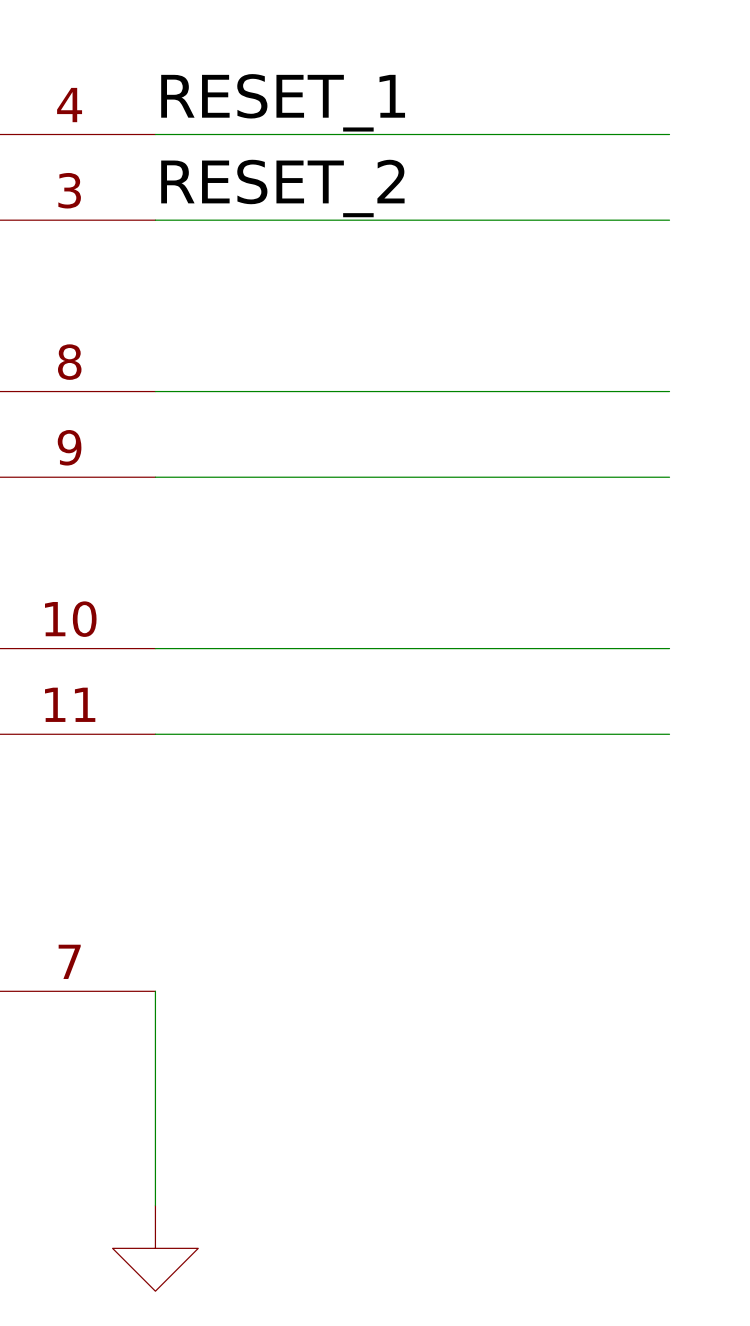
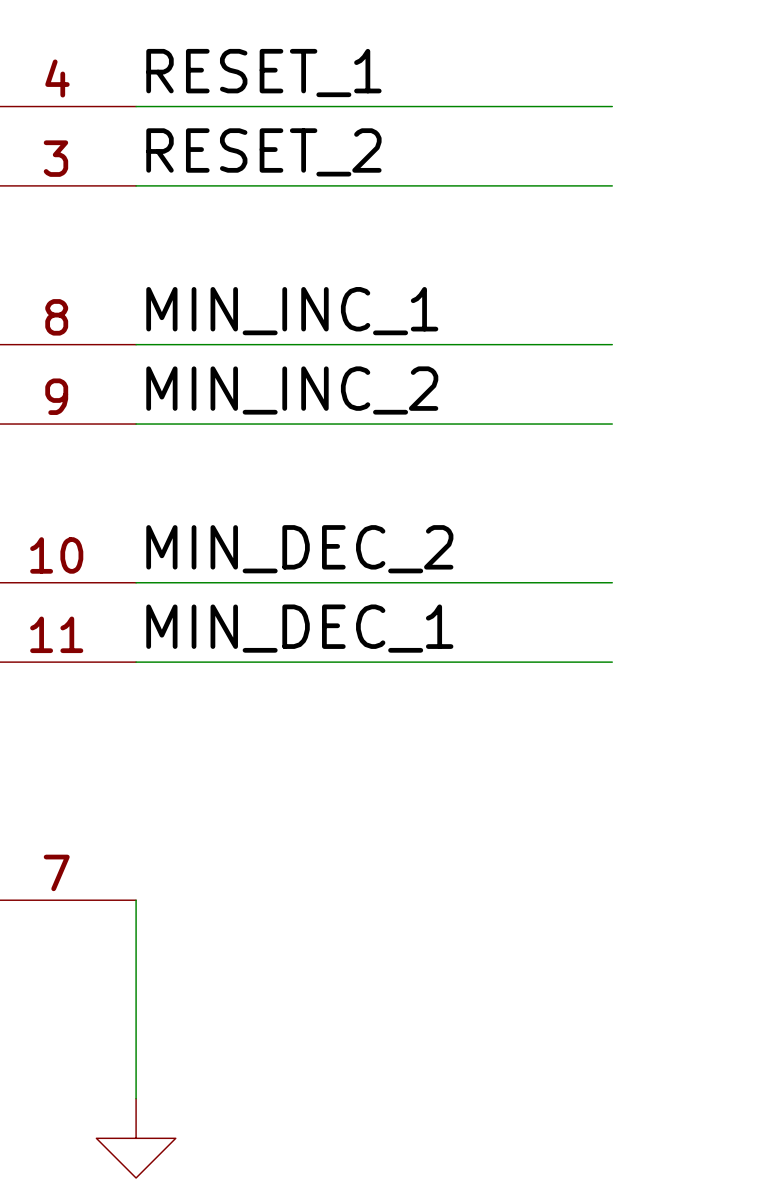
label: none -> MIN_INC_1 (292, 311)
label: none -> MIN_INC_2 (292, 390)
label: none -> MIN_DEC_2 (299, 549)
label: none -> MIN_DEC_1 (299, 628)

